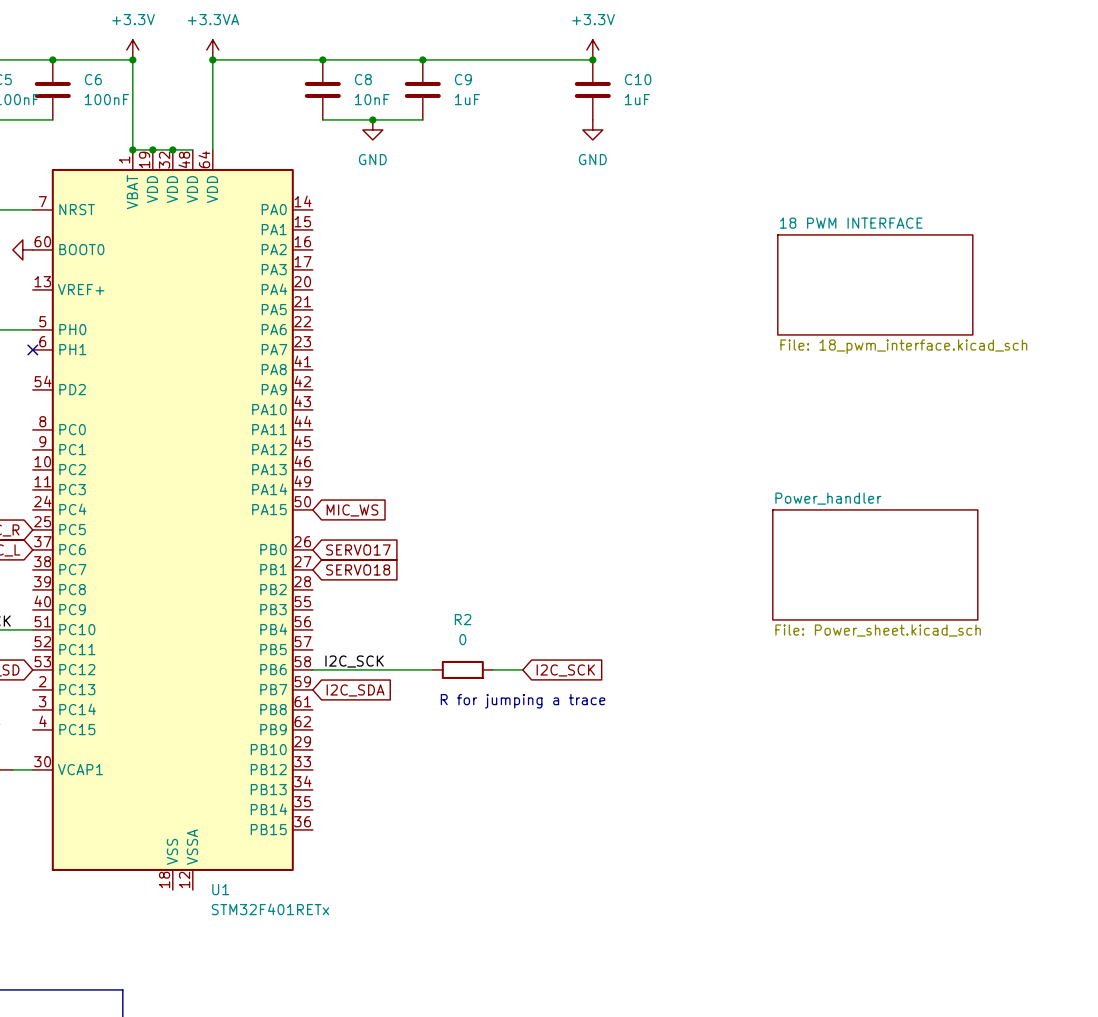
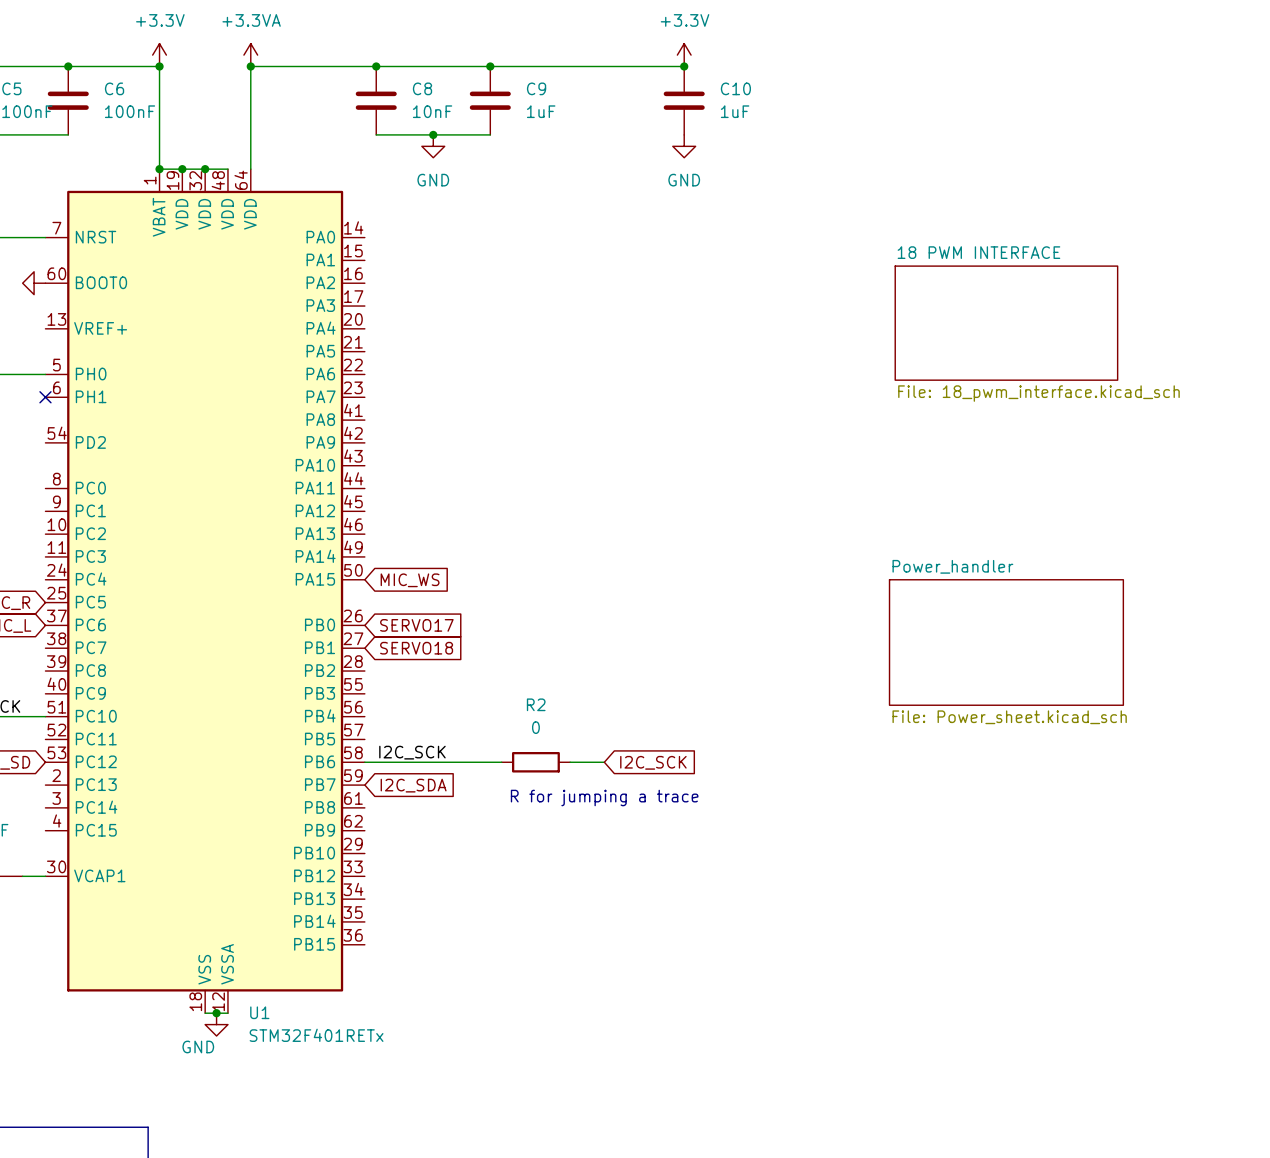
wire: none -> (205, 1013) (227, 1013)
junction: none -> (216, 1013)
power symbol: none -> GND (216, 1024)

